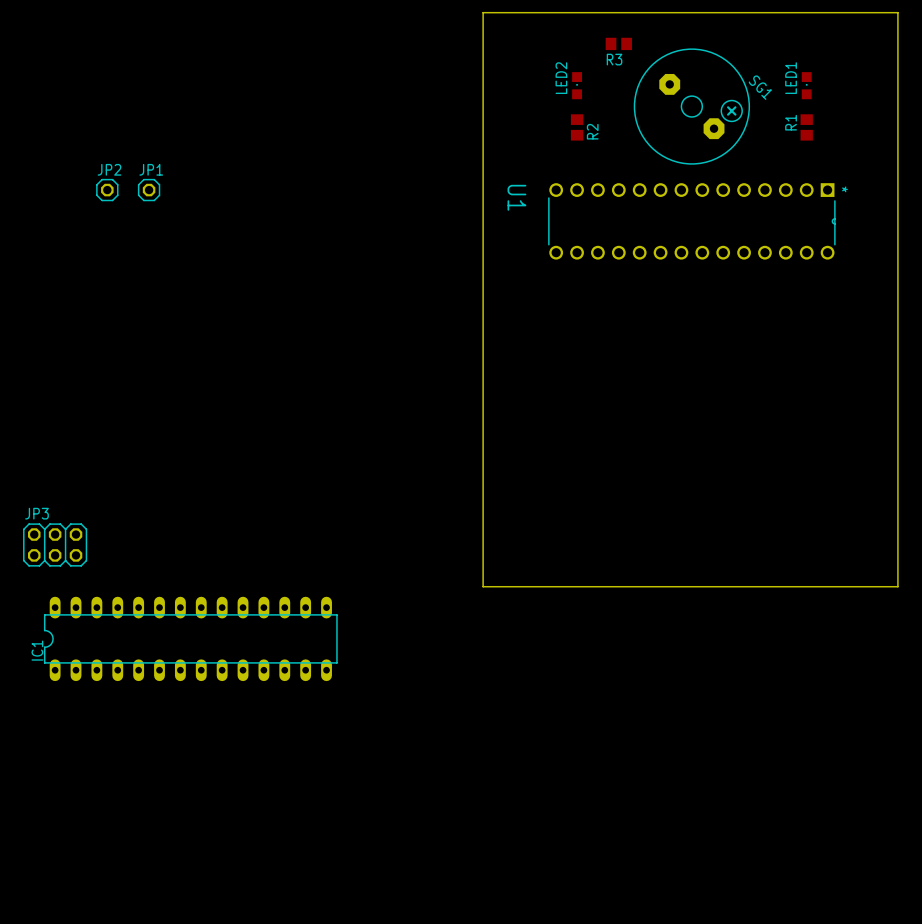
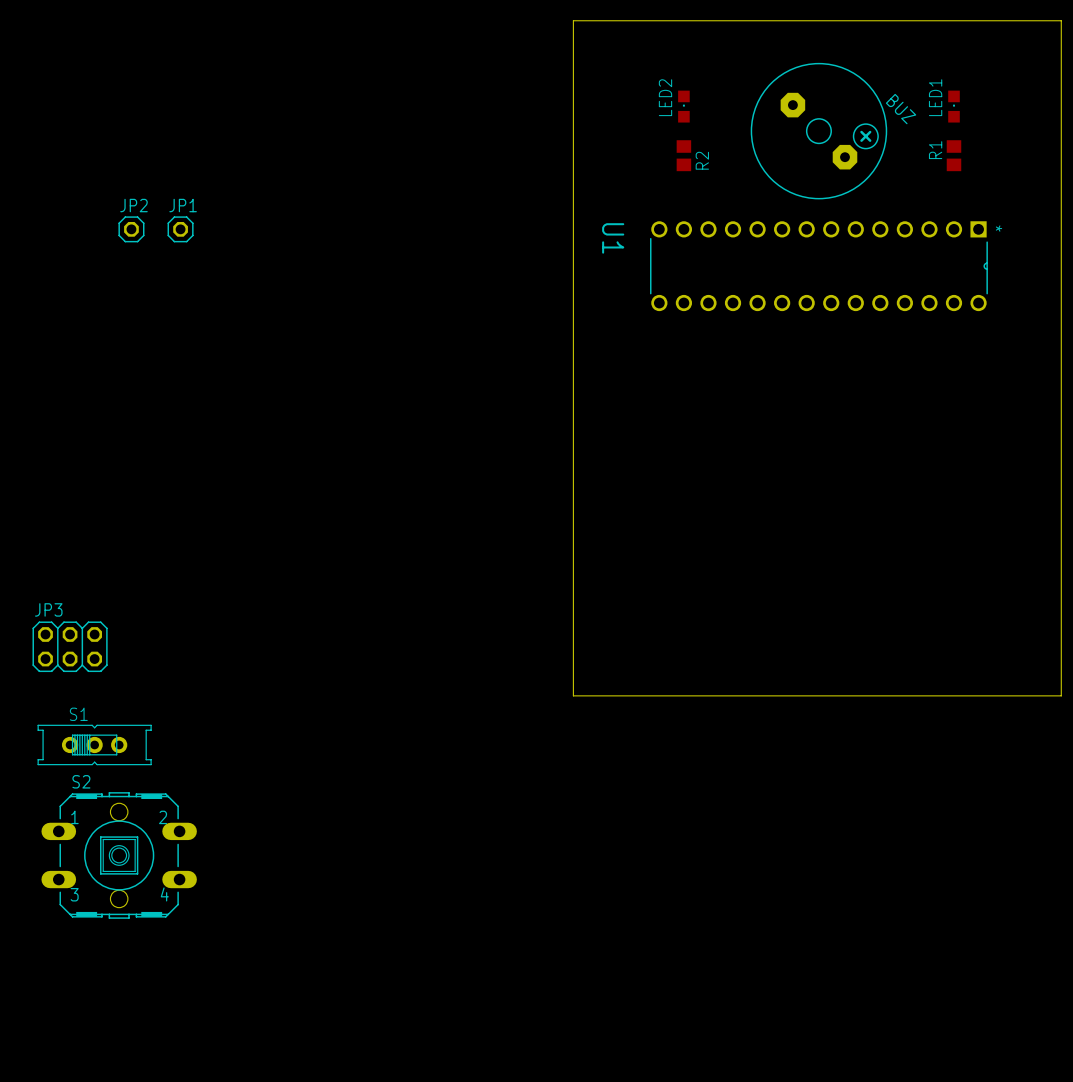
R3: (618, 43) -> none
SG1 name: SG1 (760, 87) -> BUZ (901, 109)
S1: none -> (94, 744)
IC1: (190, 638) -> none
S2: none -> (119, 855)

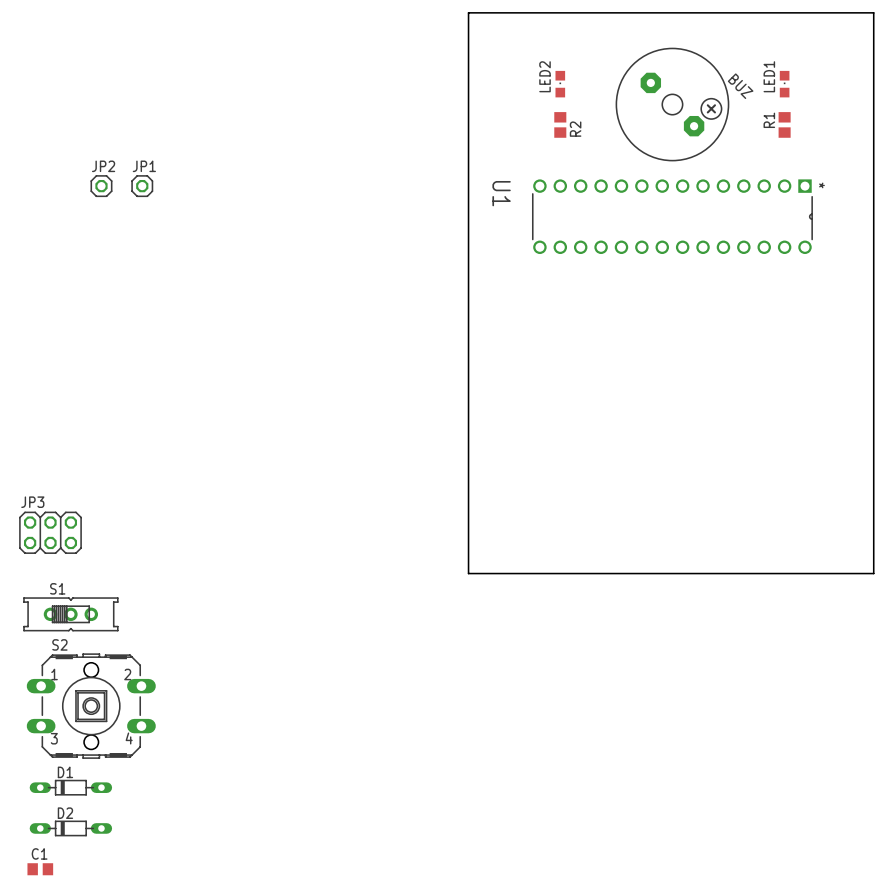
D1: none -> (70, 787)
D2: none -> (70, 828)
C1: none -> (40, 869)

